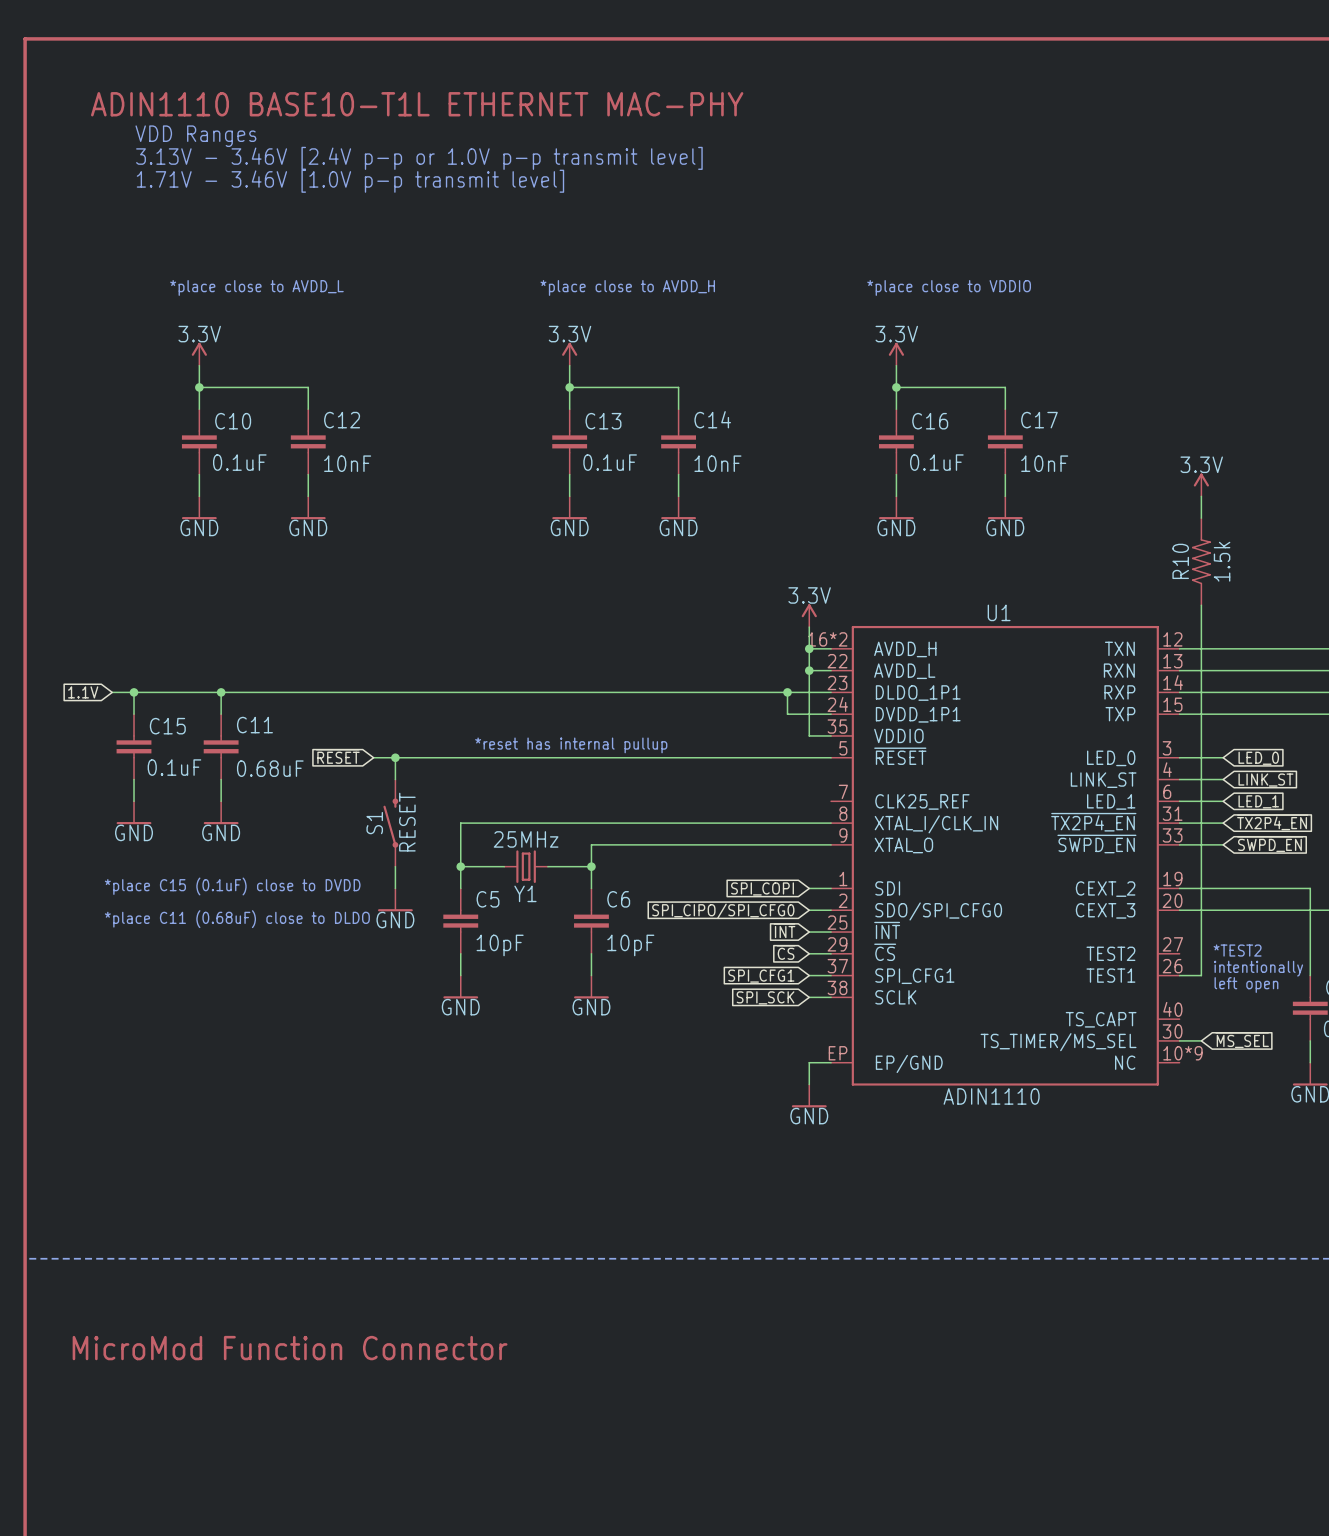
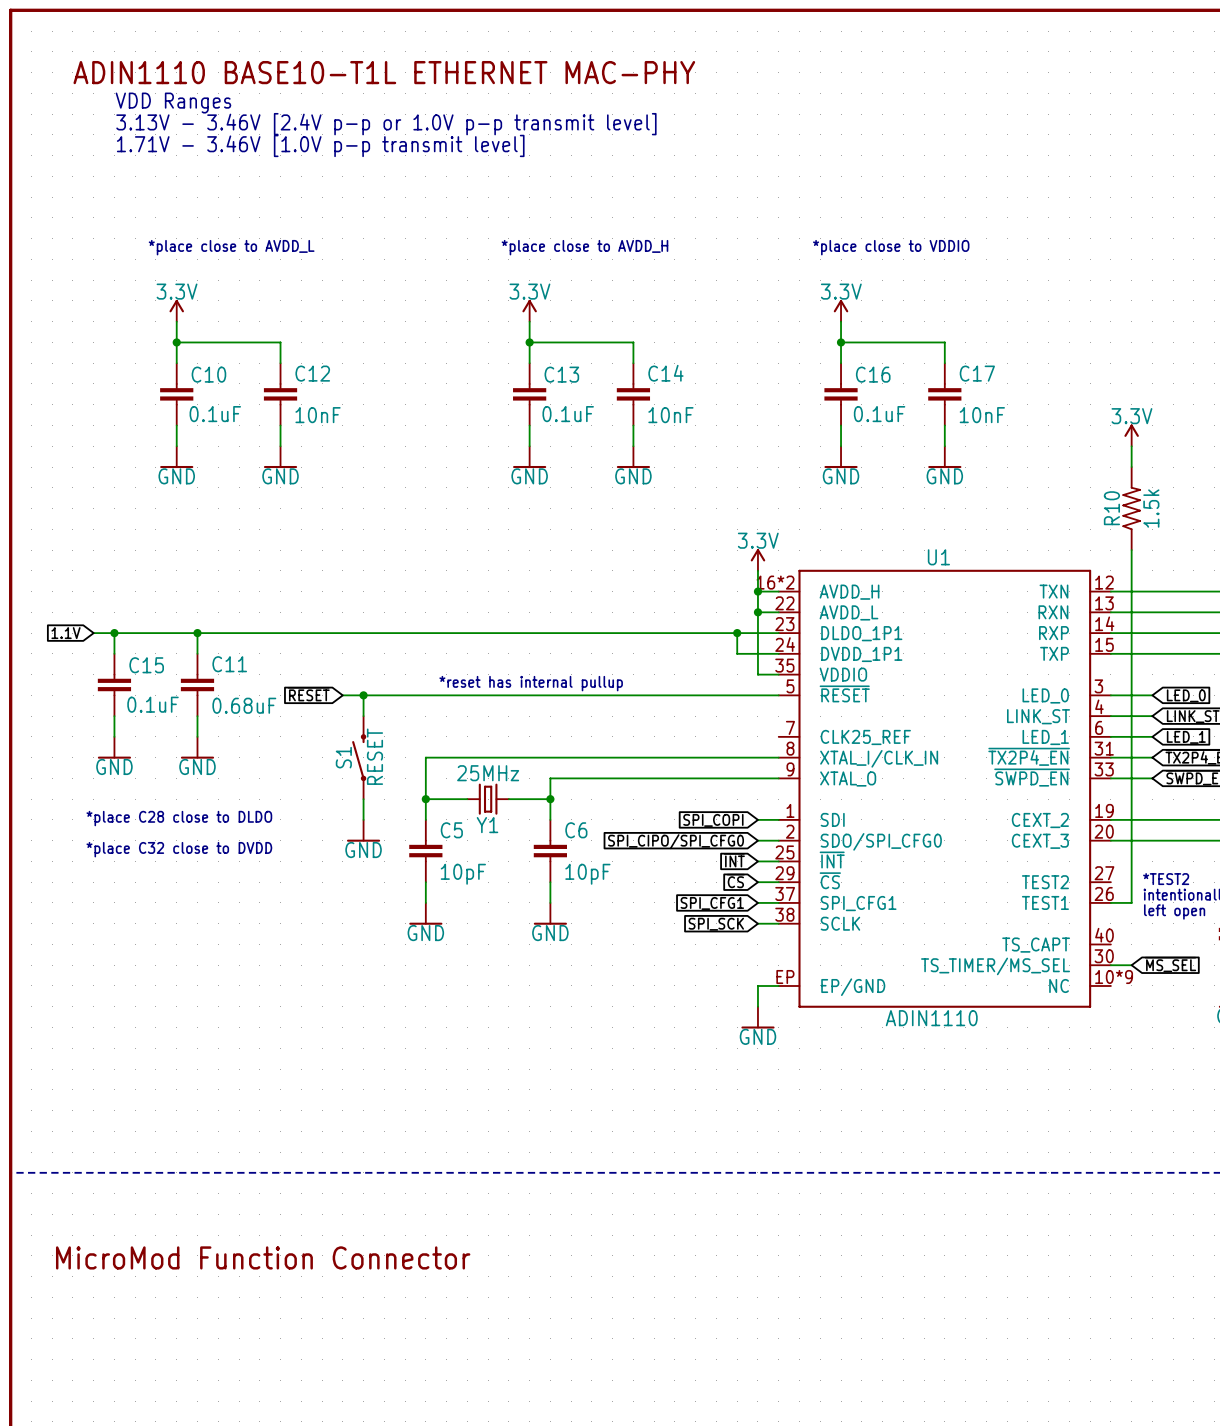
text: *place C15 (0.1uF) close to DVDD (232, 886) -> *place C28 close to DLDO (179, 818)
text: *place C11 (0.68uF) close to DLDO (237, 919) -> *place C32 close to DVDD (179, 849)

